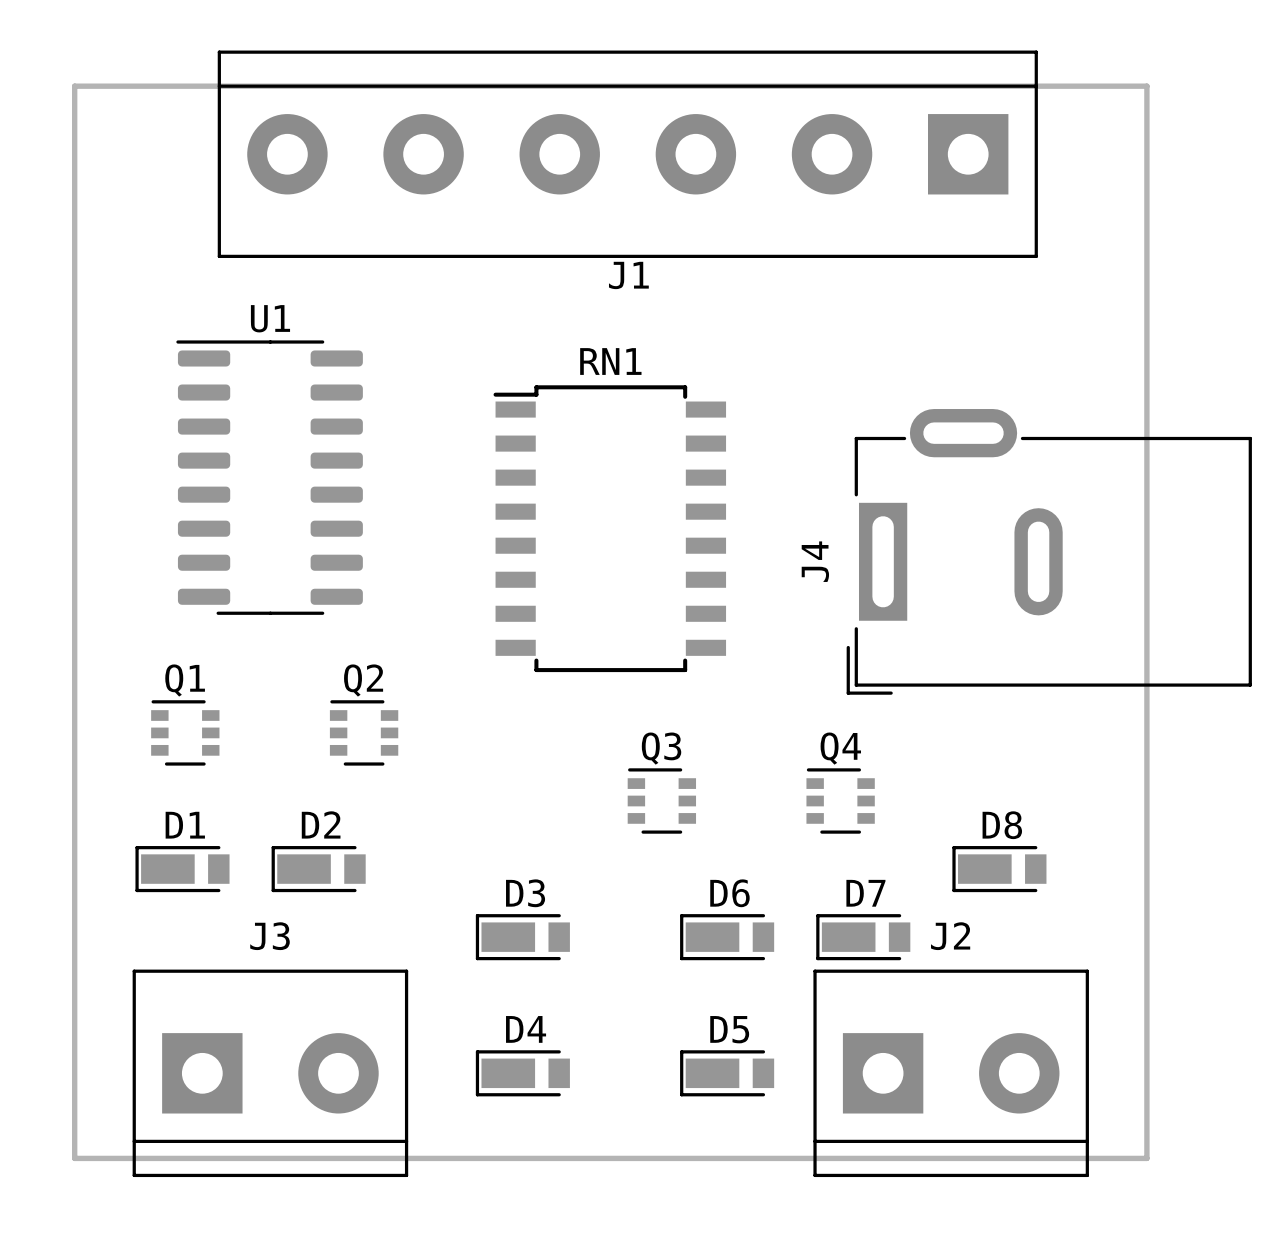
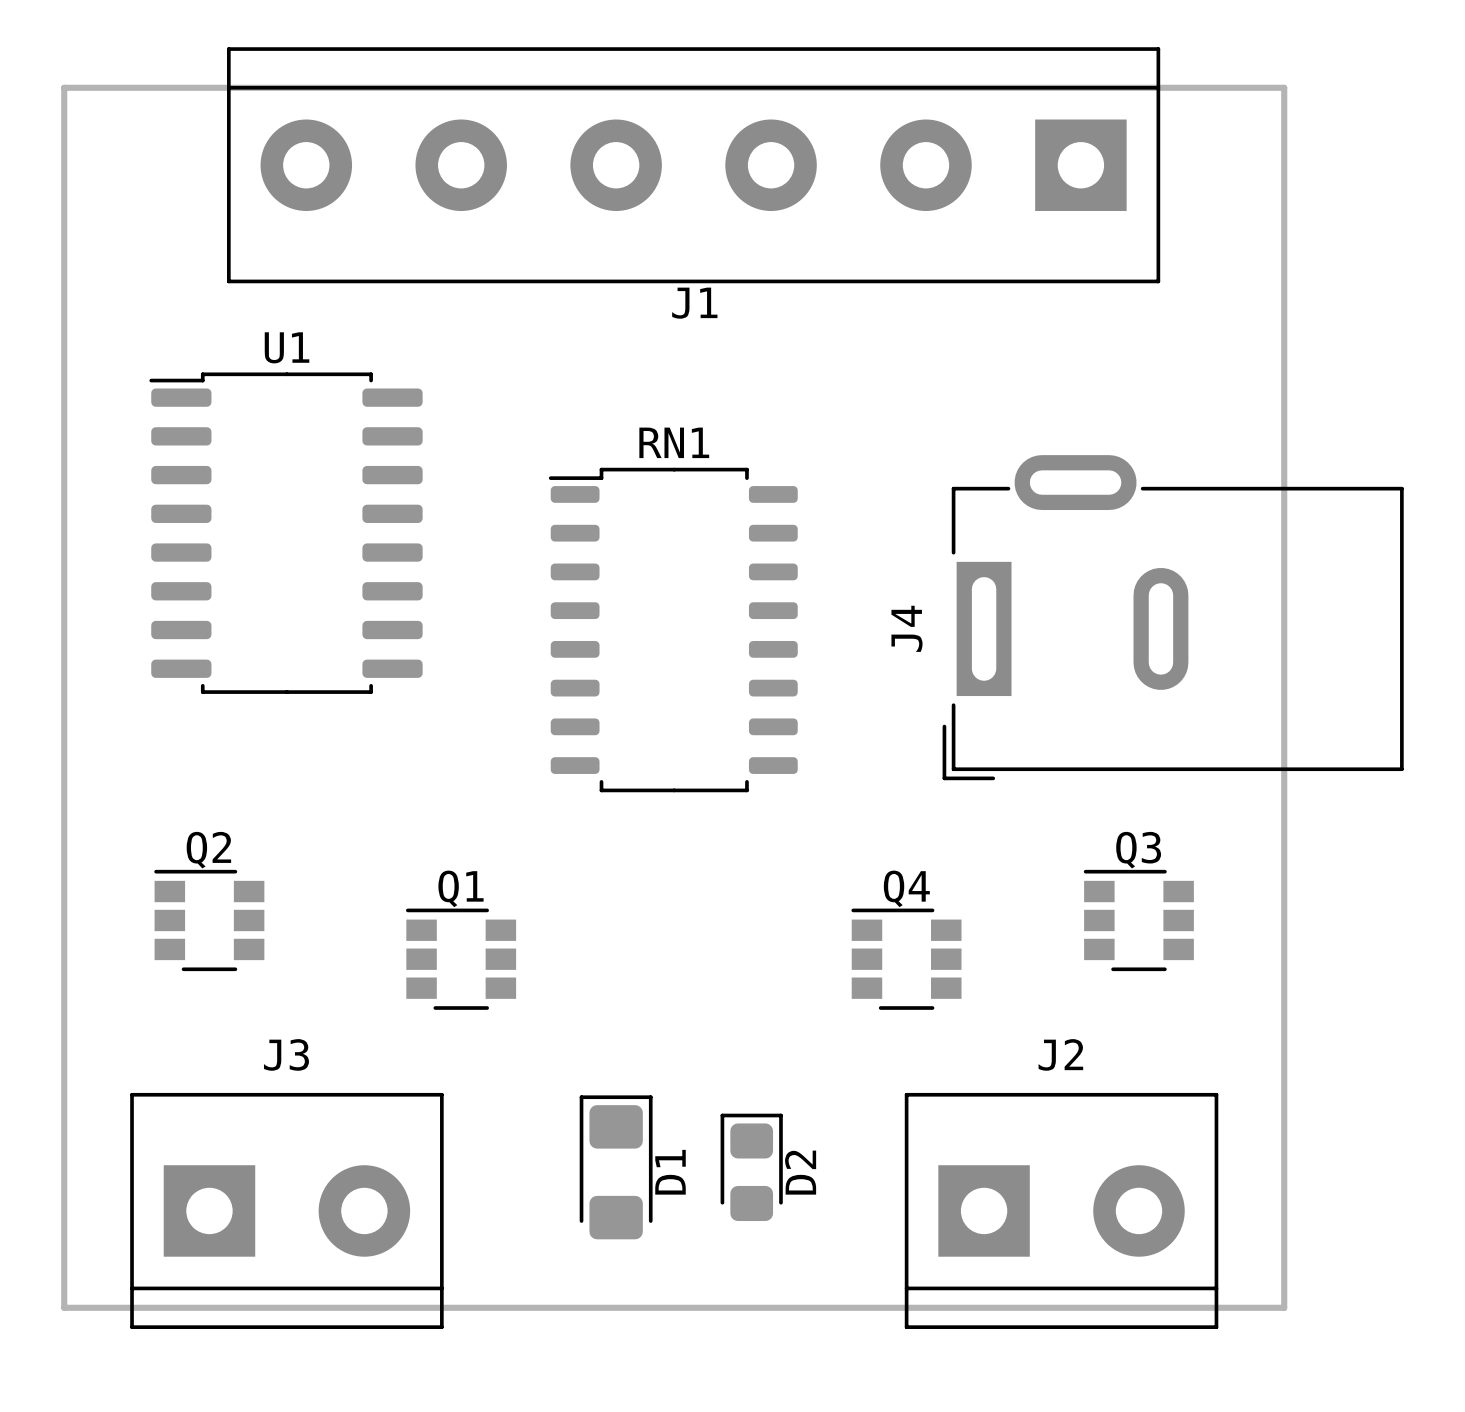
U1 footprint: [176, 340, 363, 615] -> [149, 372, 423, 694]
RN1 footprint: [493, 385, 727, 673] -> [548, 467, 798, 793]
Q1 footprint: [151, 700, 220, 766] -> [406, 908, 517, 1010]
Q2 footprint: [329, 700, 399, 766] -> [154, 869, 265, 972]
Q3 footprint: [627, 768, 697, 834] -> [1083, 869, 1194, 972]
Q4 footprint: [806, 768, 875, 834] -> [851, 908, 962, 1010]
D2 name position: D2 (321, 824) -> D2 (800, 1172)
D1 name position: D1 (185, 825) -> D1 (670, 1172)
D1 footprint: [135, 846, 230, 893] -> [579, 1095, 653, 1240]
D2 footprint: [271, 846, 366, 893] -> [720, 1113, 783, 1222]
D8: (999, 869) -> none
D3: (522, 937) -> none
D6: (727, 937) -> none
D7: (863, 937) -> none
D4: (522, 1073) -> none
D5: (727, 1073) -> none

